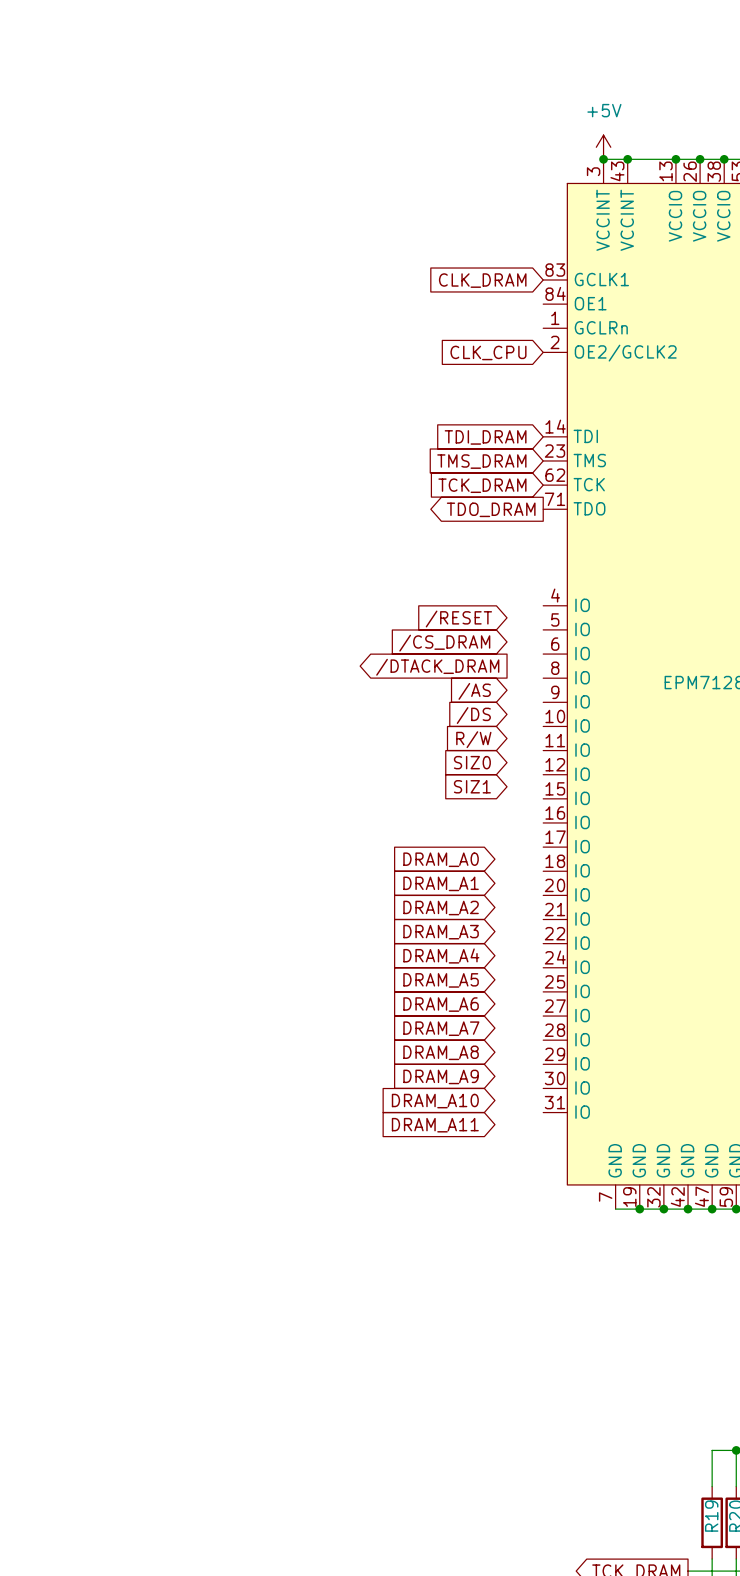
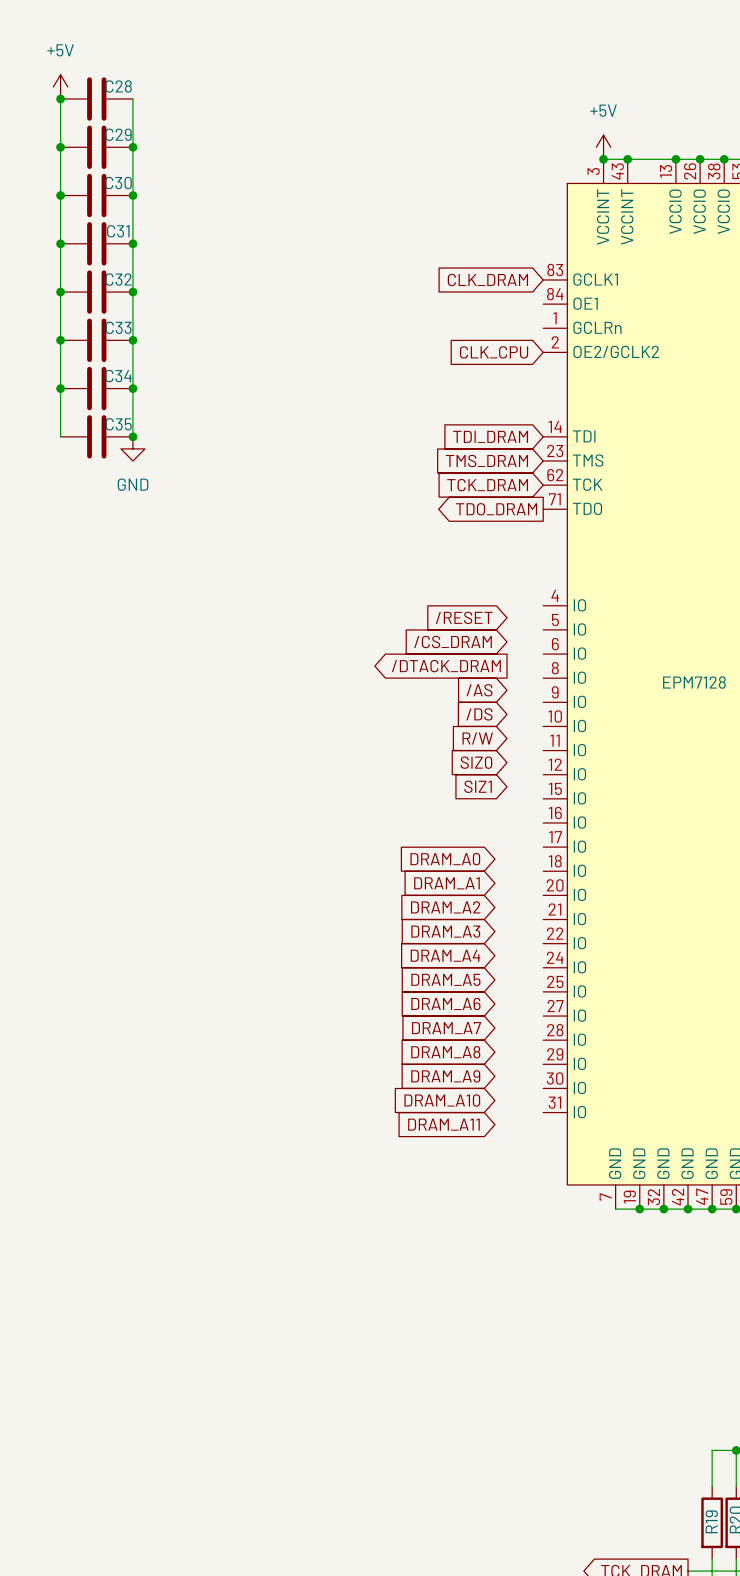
power symbol: none -> +5V (60, 86)
wire: none -> (60, 99) (60, 436)
junction: none -> (60, 99)
C28: none -> (96, 99)
wire: none -> (132, 99) (132, 436)
junction: none -> (60, 147)
C29: none -> (96, 147)
junction: none -> (132, 147)
junction: none -> (60, 195)
C30: none -> (96, 195)
junction: none -> (132, 195)
junction: none -> (60, 243)
C31: none -> (96, 243)
junction: none -> (132, 243)
junction: none -> (60, 292)
C32: none -> (96, 292)
junction: none -> (132, 292)
junction: none -> (60, 340)
C33: none -> (96, 340)
junction: none -> (132, 340)
junction: none -> (60, 388)
C34: none -> (96, 388)
junction: none -> (132, 388)
C35: none -> (96, 436)
junction: none -> (132, 436)
power symbol: none -> GND (132, 448)

